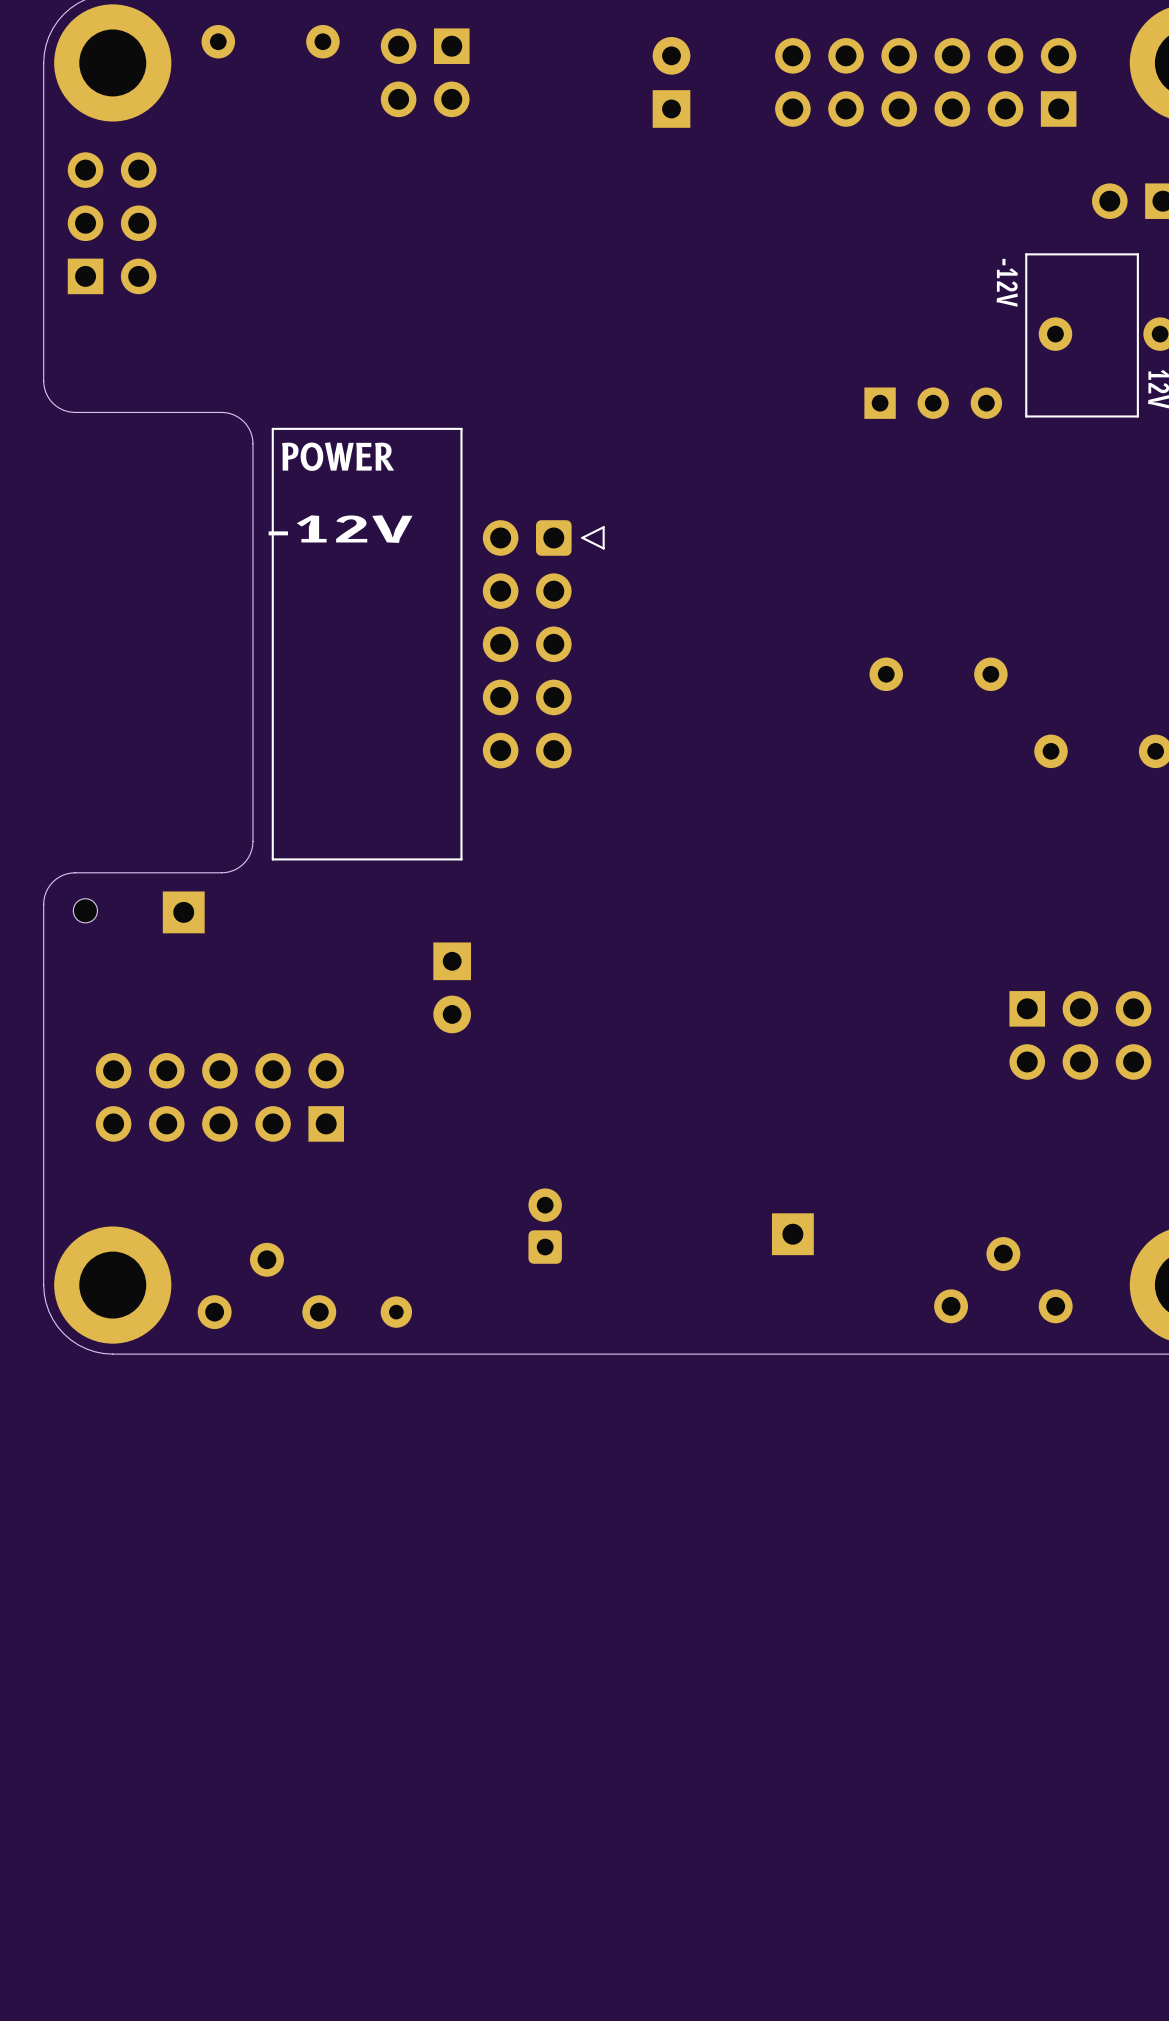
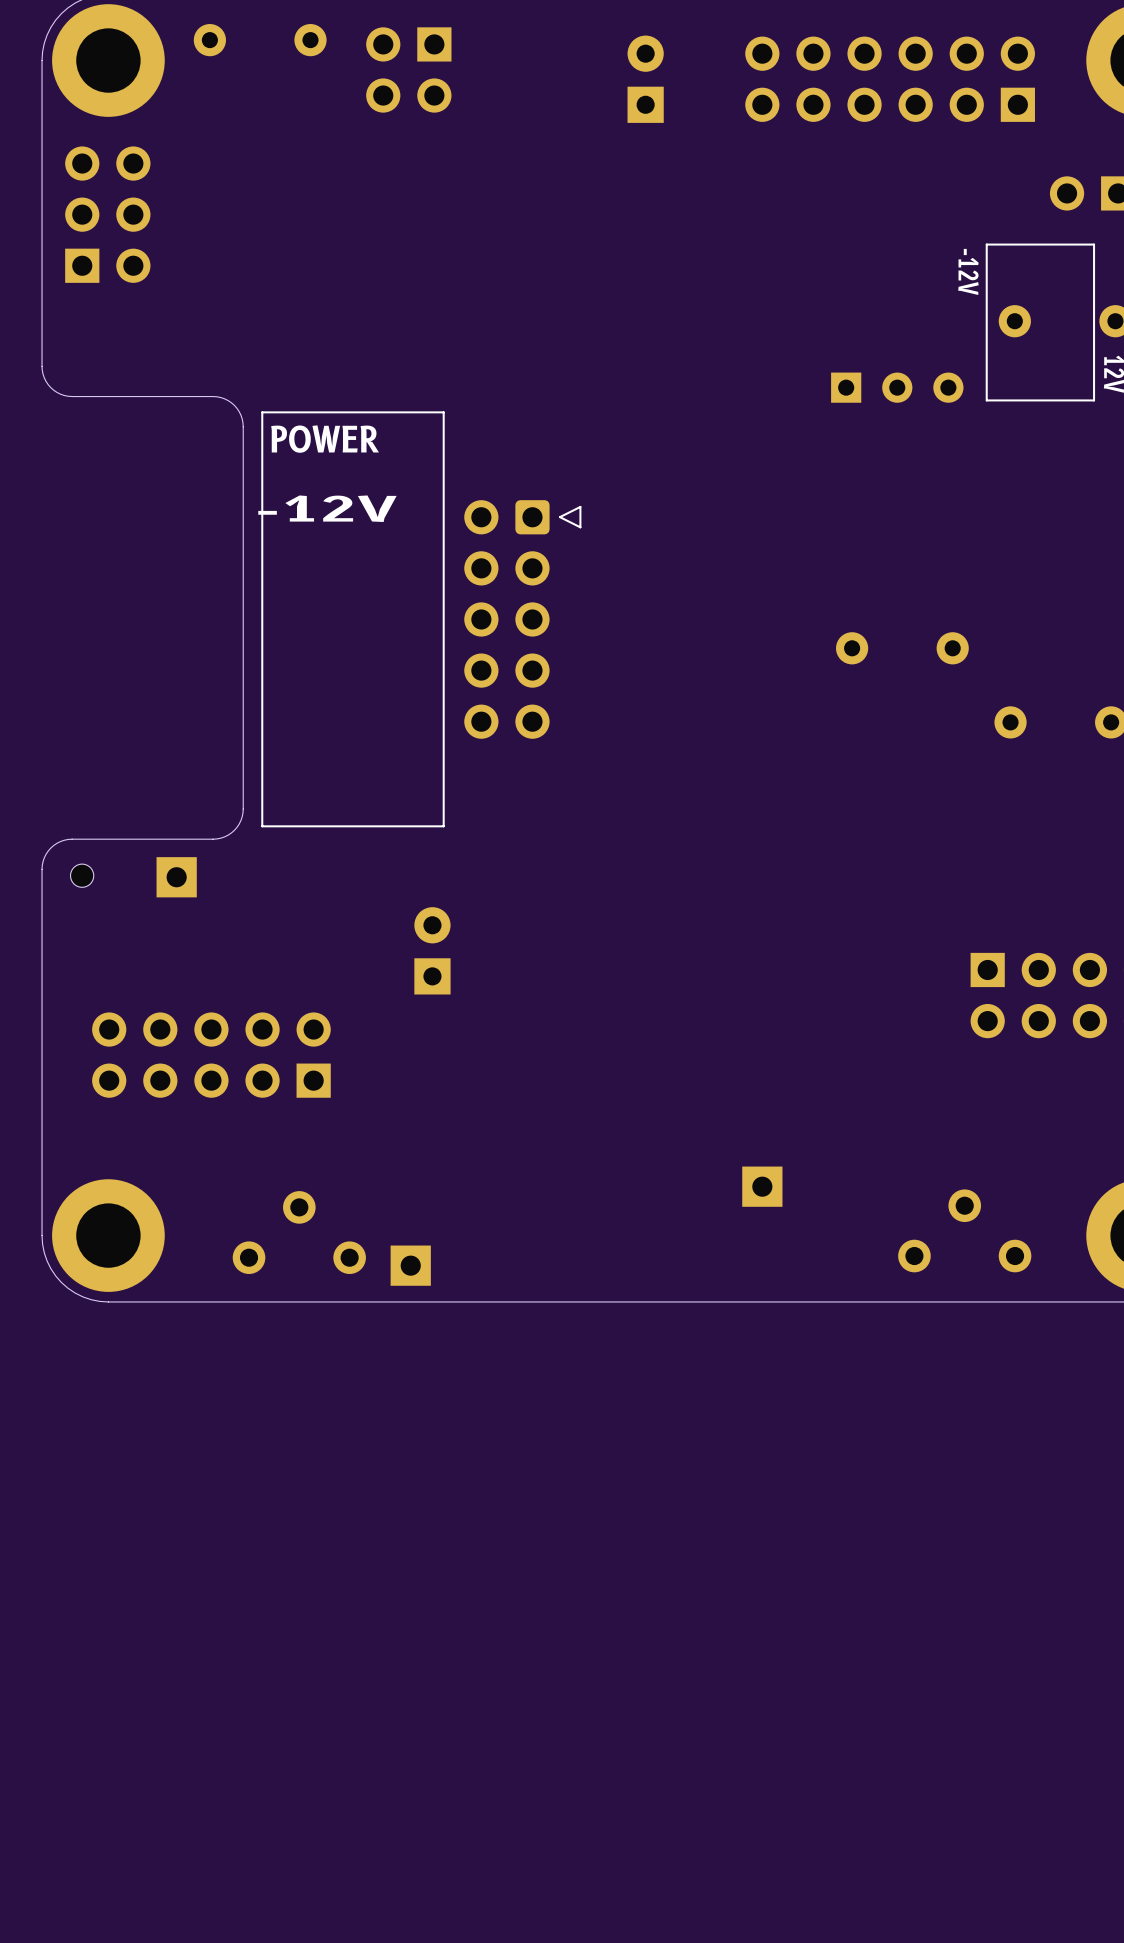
part rotation: 0° (452, 987) -> 180° (432, 950)
part: (545, 1226) -> none
part position: (266, 1285) -> (299, 1232)
part: (396, 1312) -> none
part: none -> (410, 1265)

